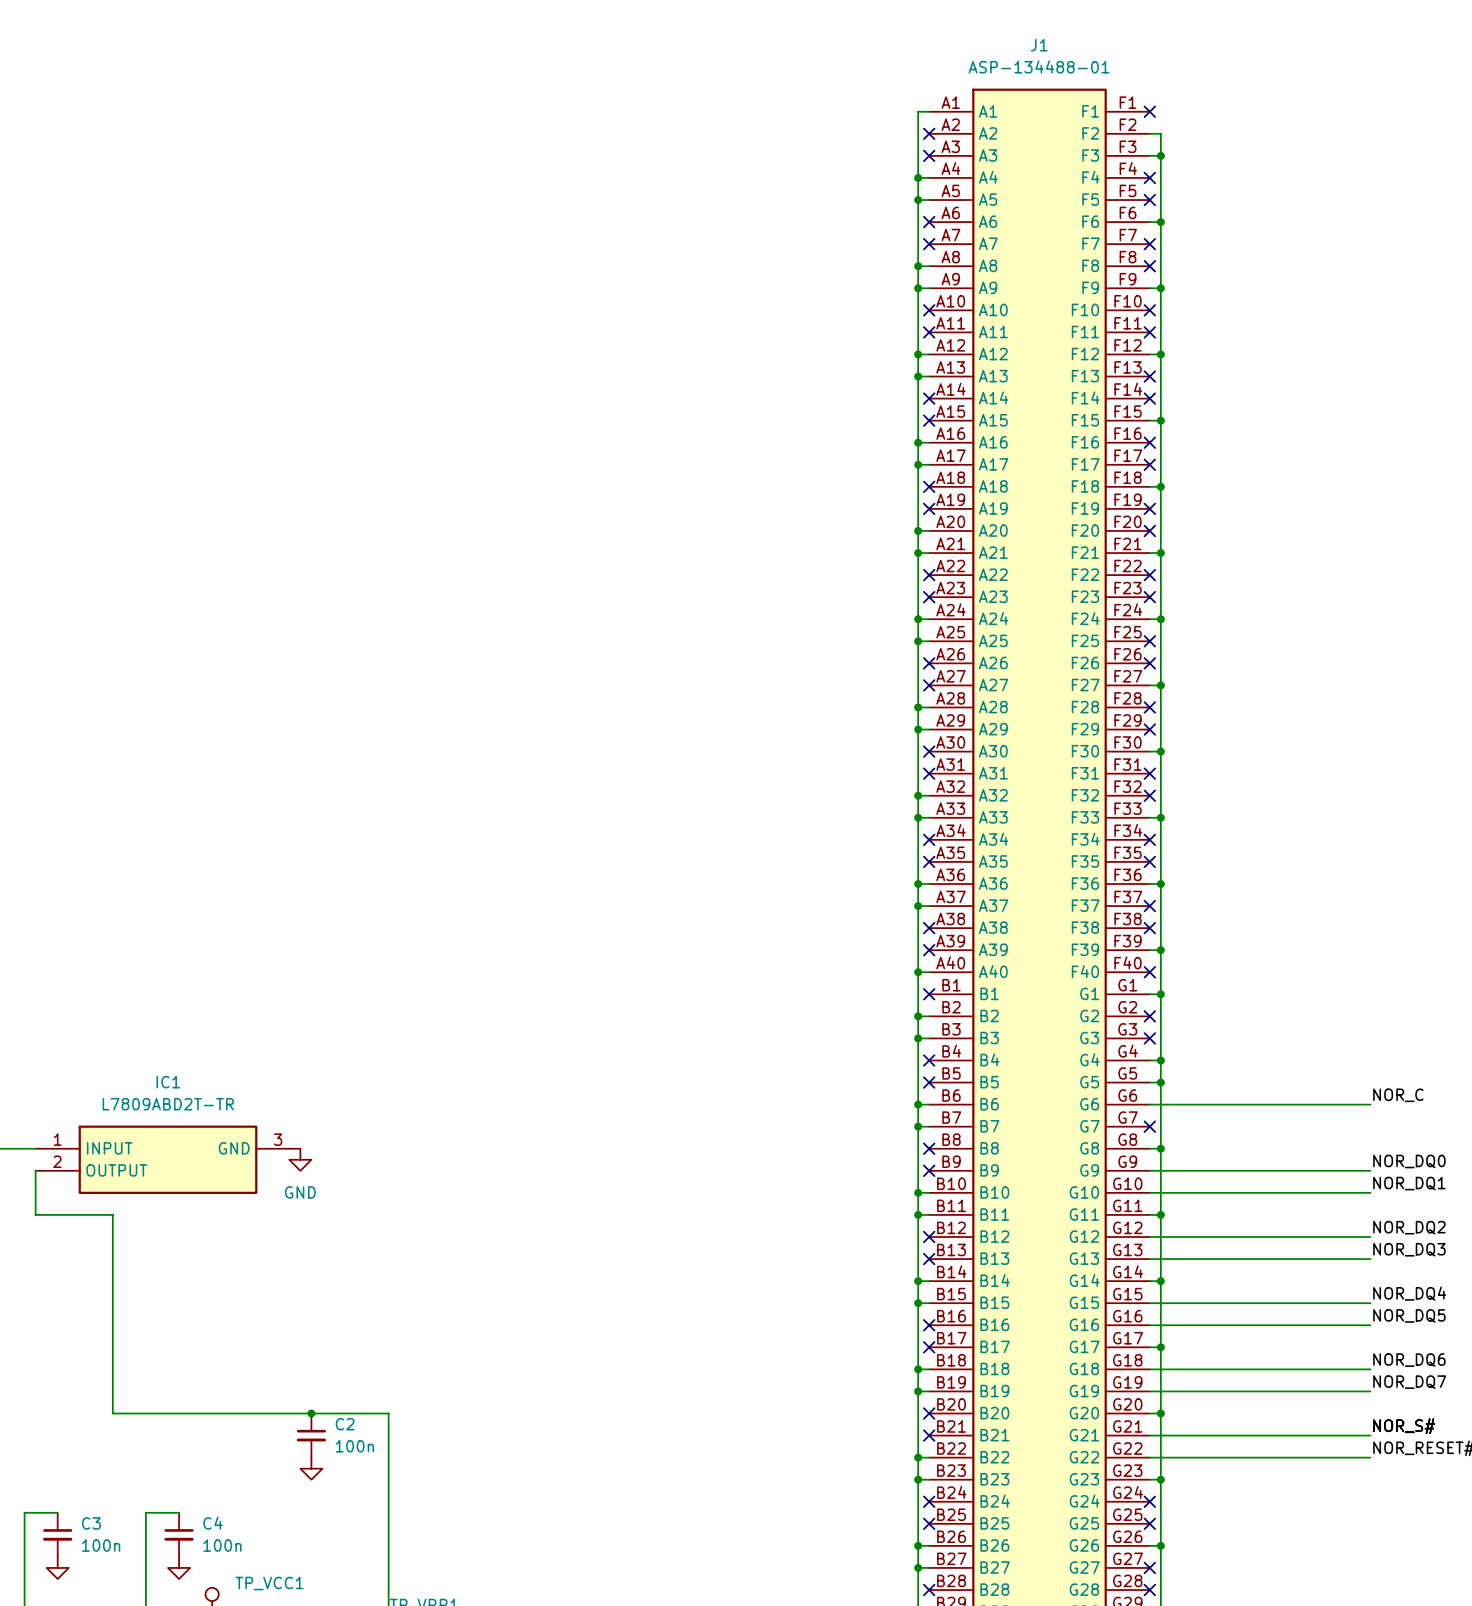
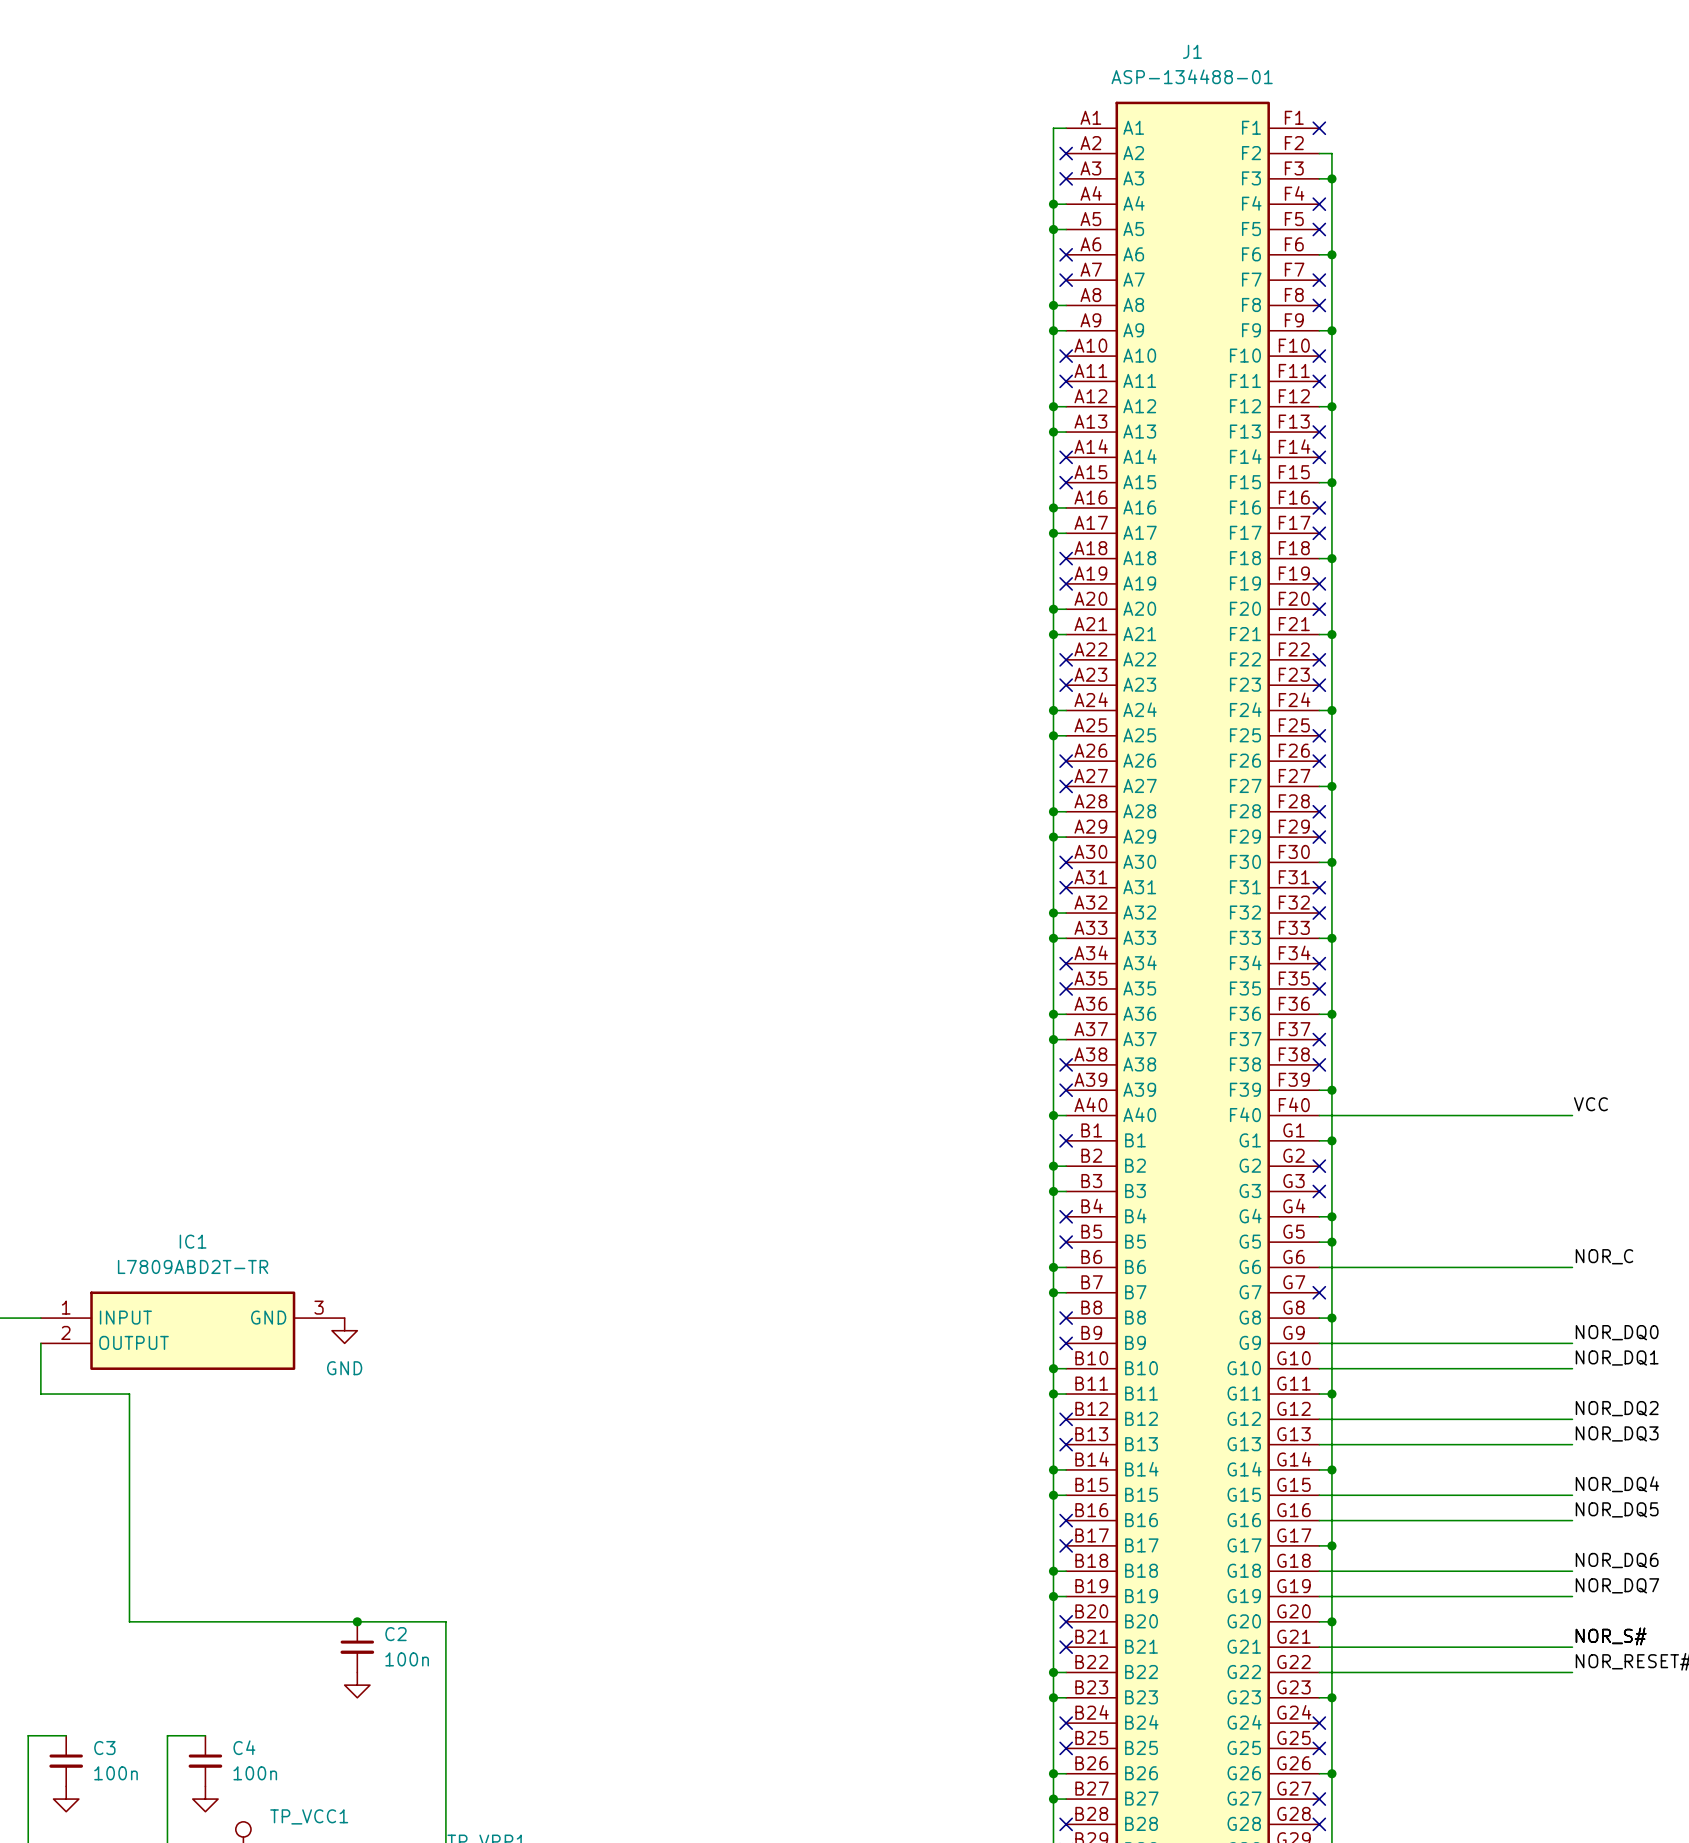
label: none -> VCC (1590, 1104)
wire: none -> (1319, 1115) (1572, 1115)
no-connect mark: (1149, 972) -> none

